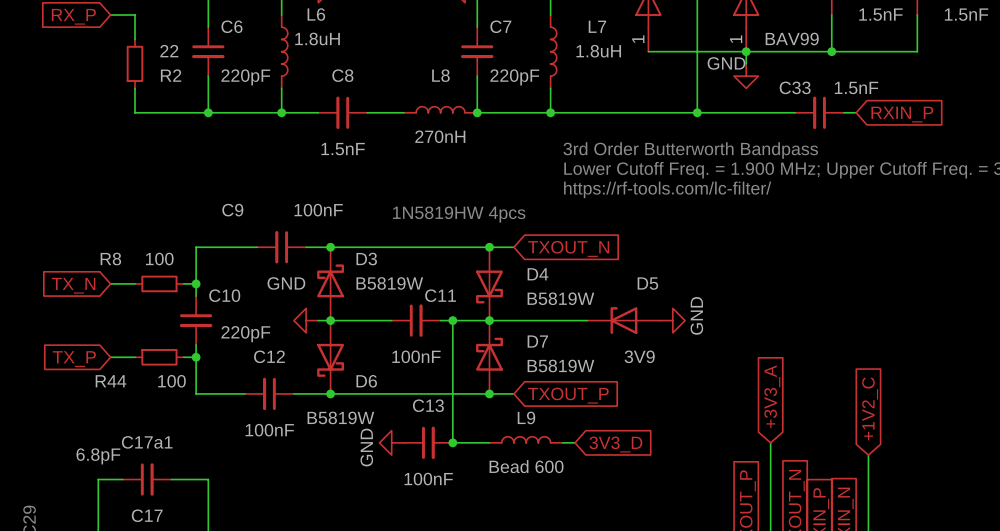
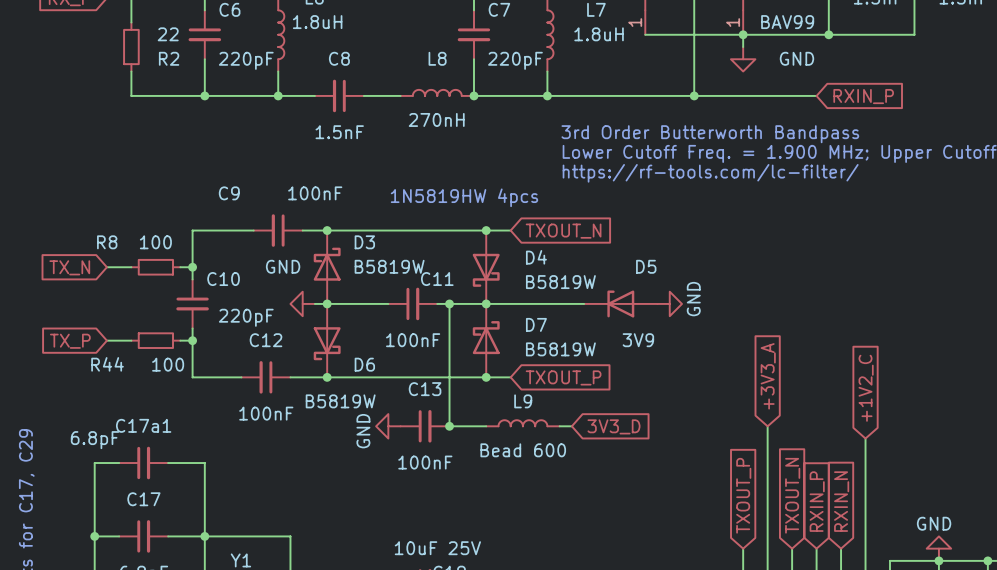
power symbol text position: GND (726, 63) -> GND (796, 58)
C33: 1.5nF (819, 112) -> none
wire: (843, 112) (856, 112) -> none
global label position: RXIN_P (902, 114) -> RXIN_P (863, 96)

